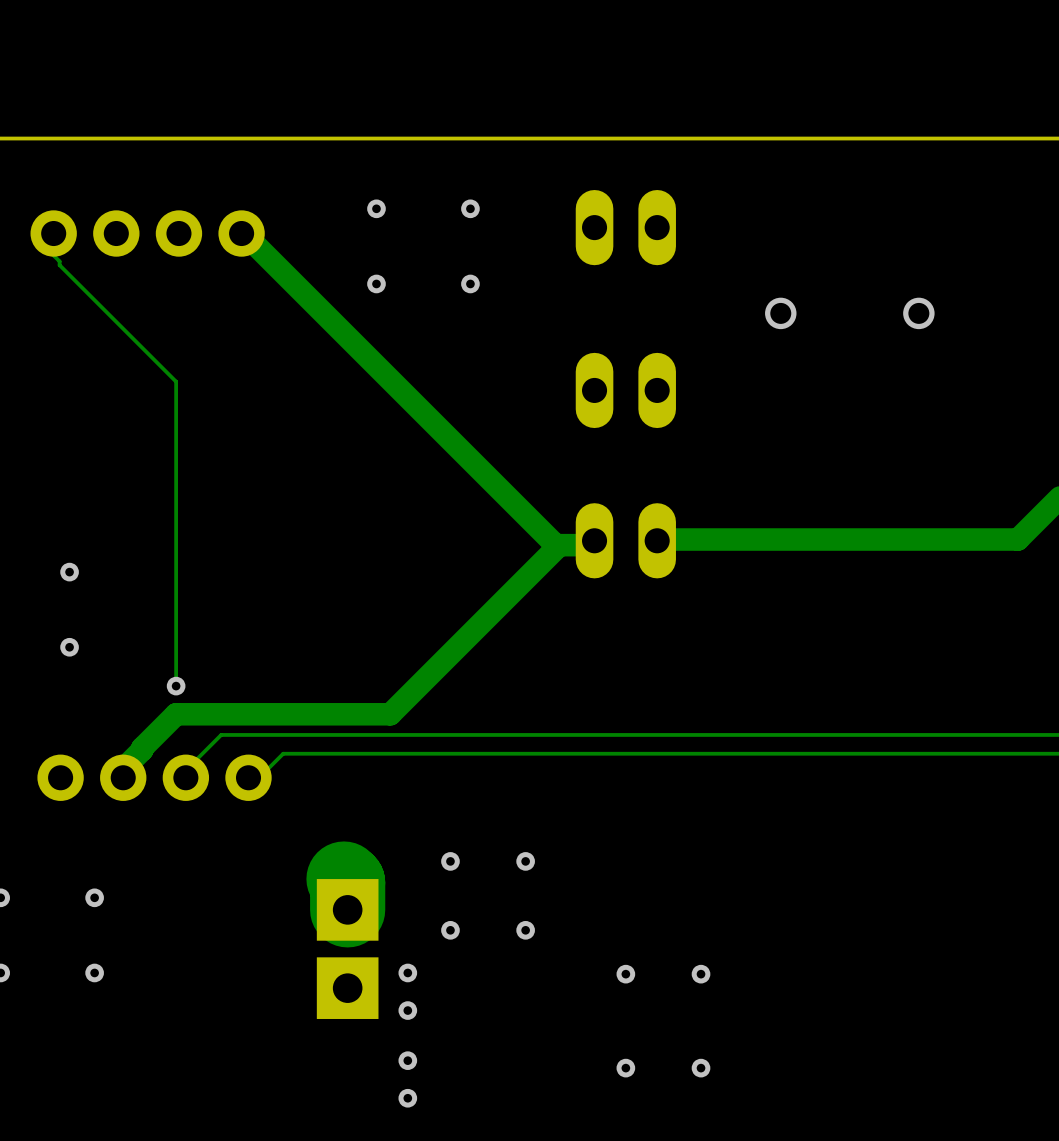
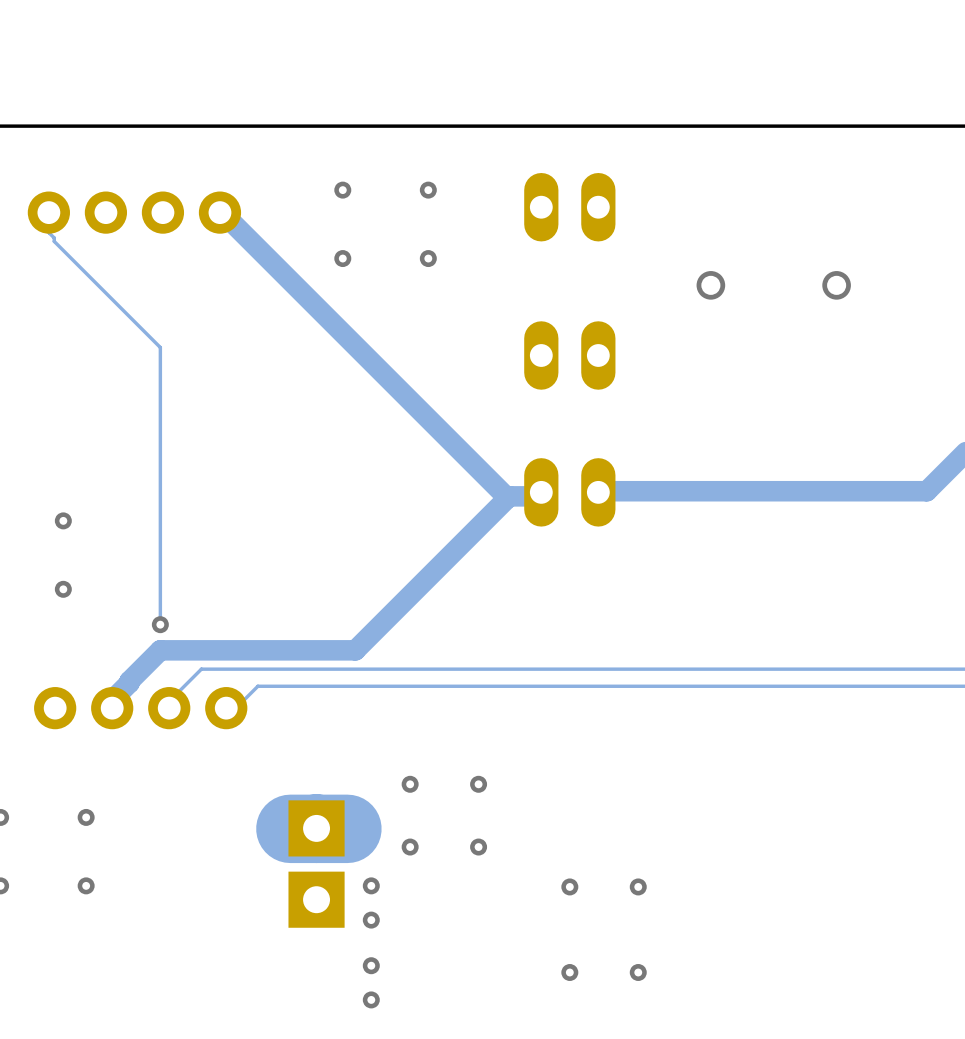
track: (343, 879) (347, 882) (347, 909) -> none
track: none -> (347, 828) (290, 828)

